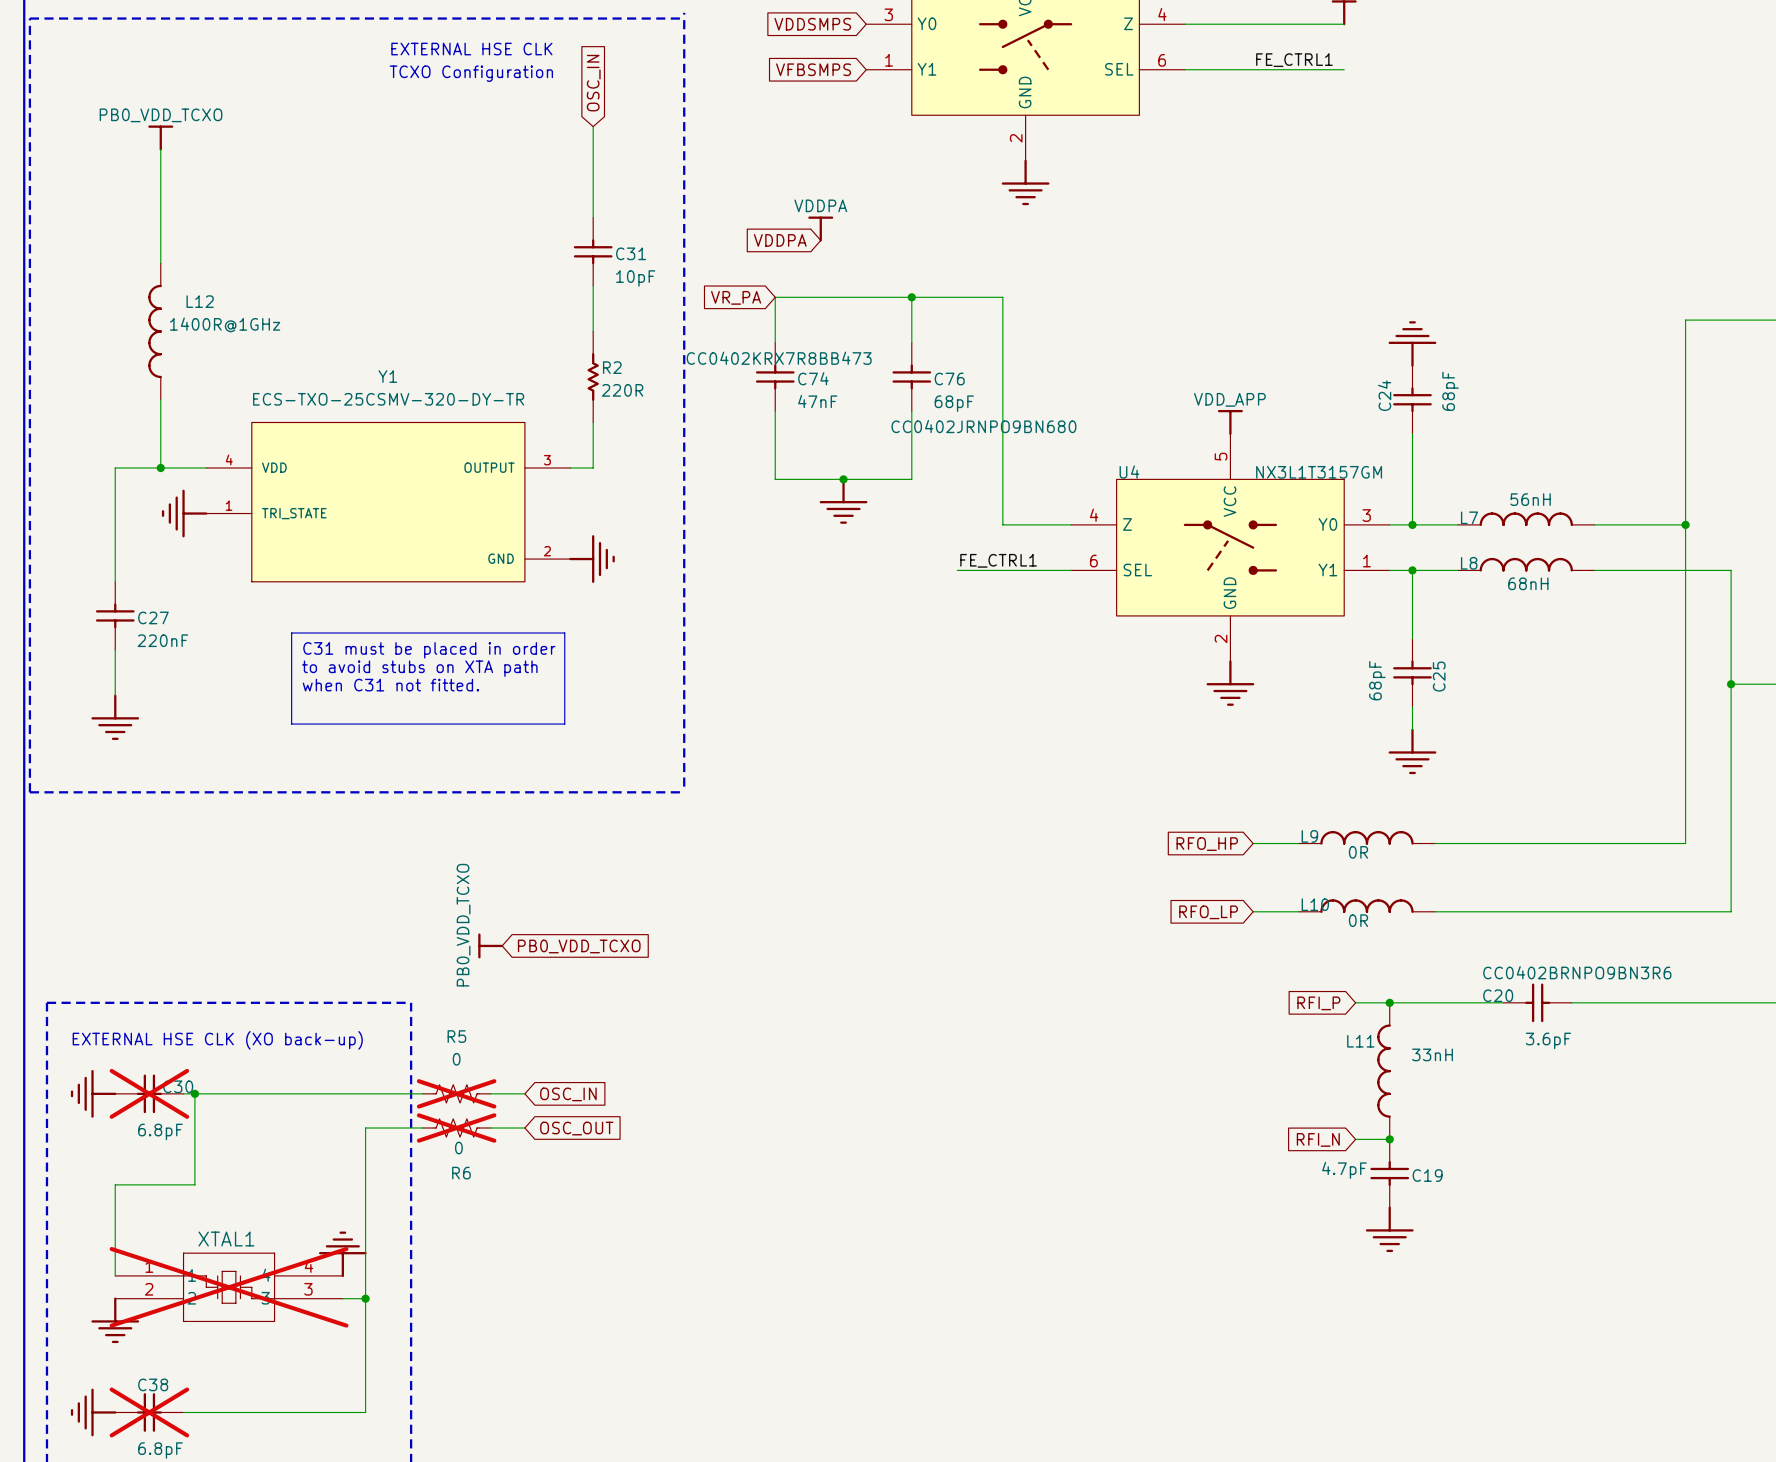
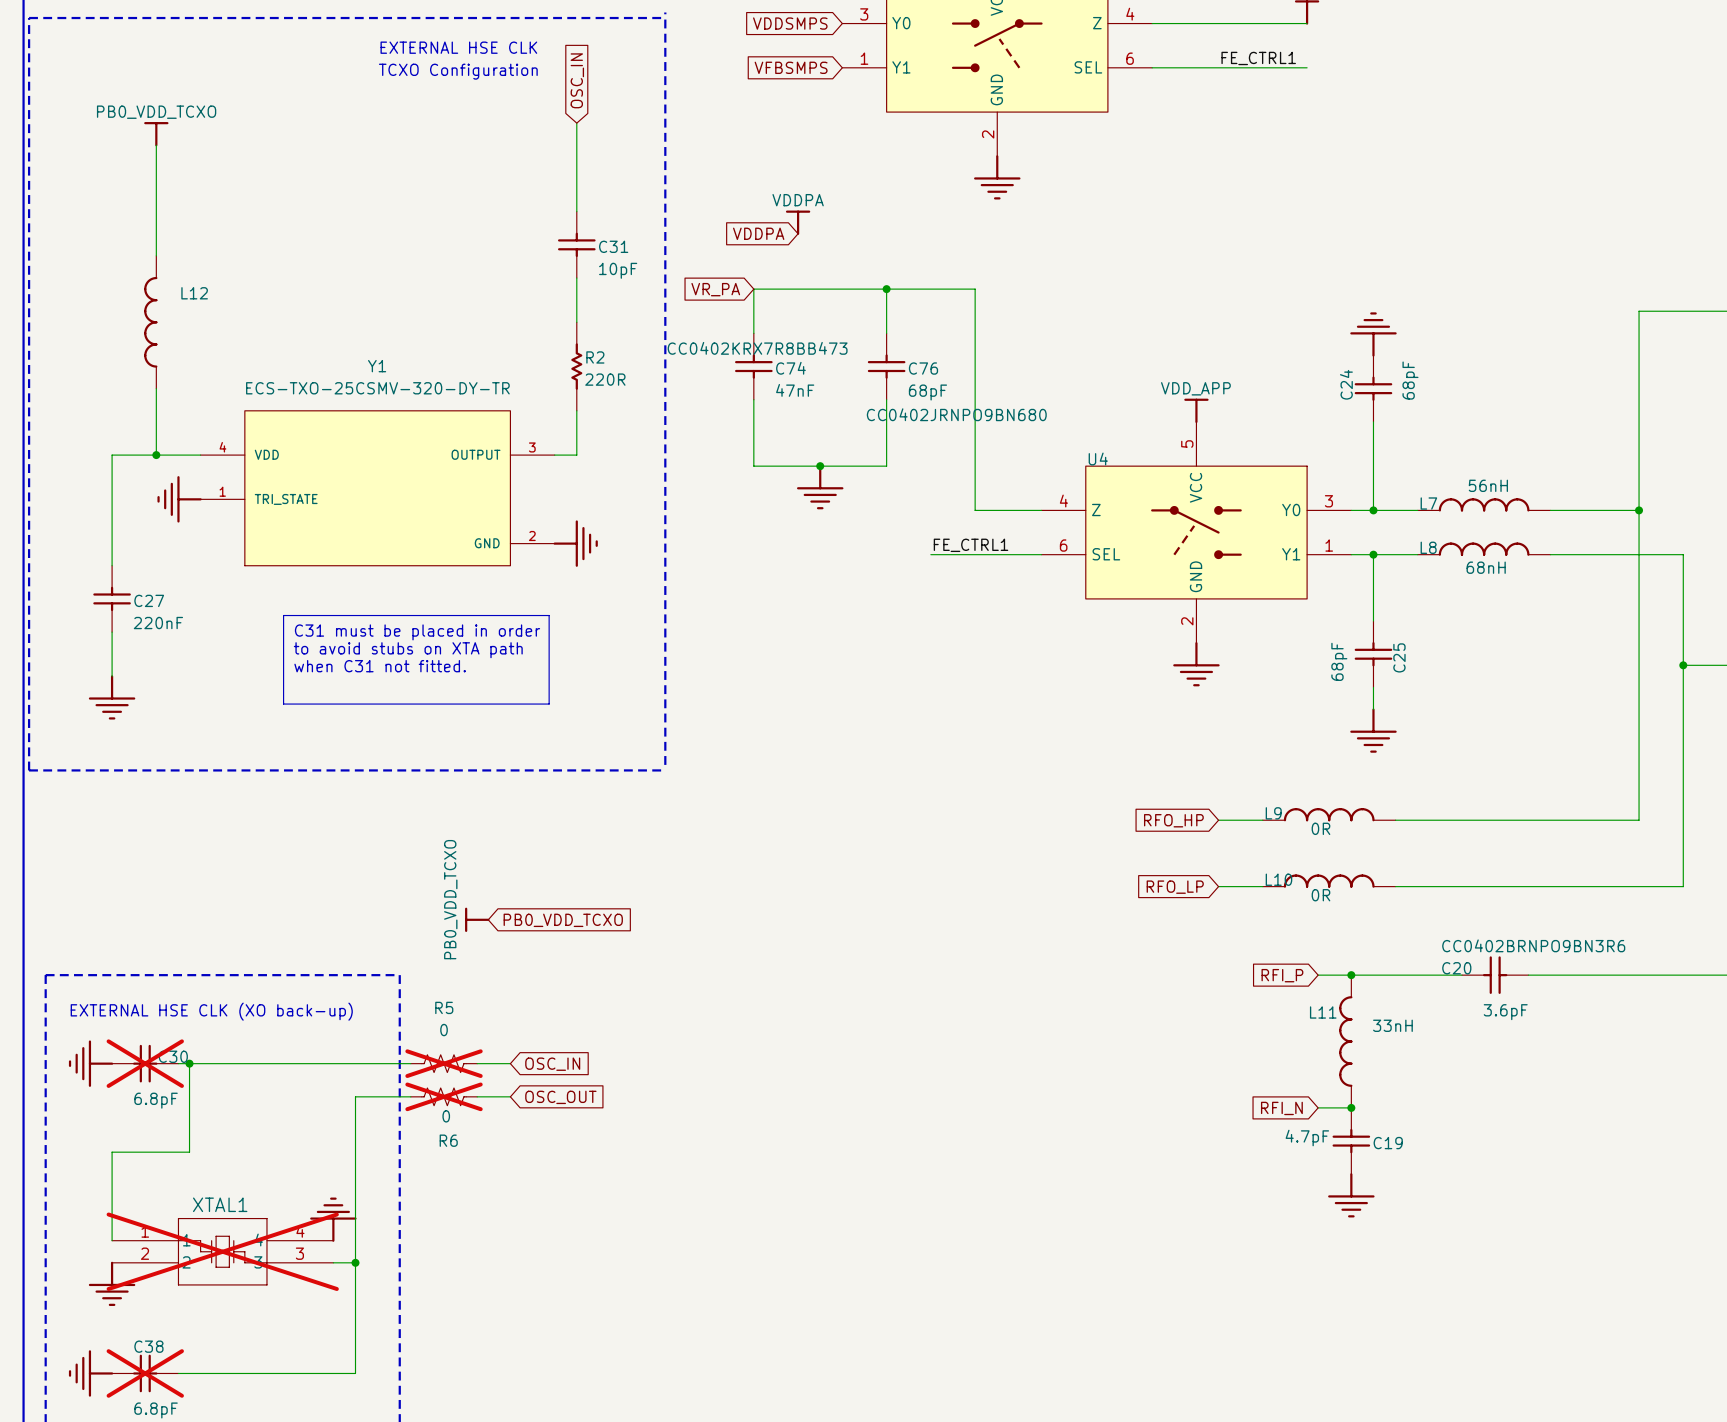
L12 text: 1400R@1GHz (225, 324) -> none
U4 text: NX3L1T3157GM (1319, 472) -> none

